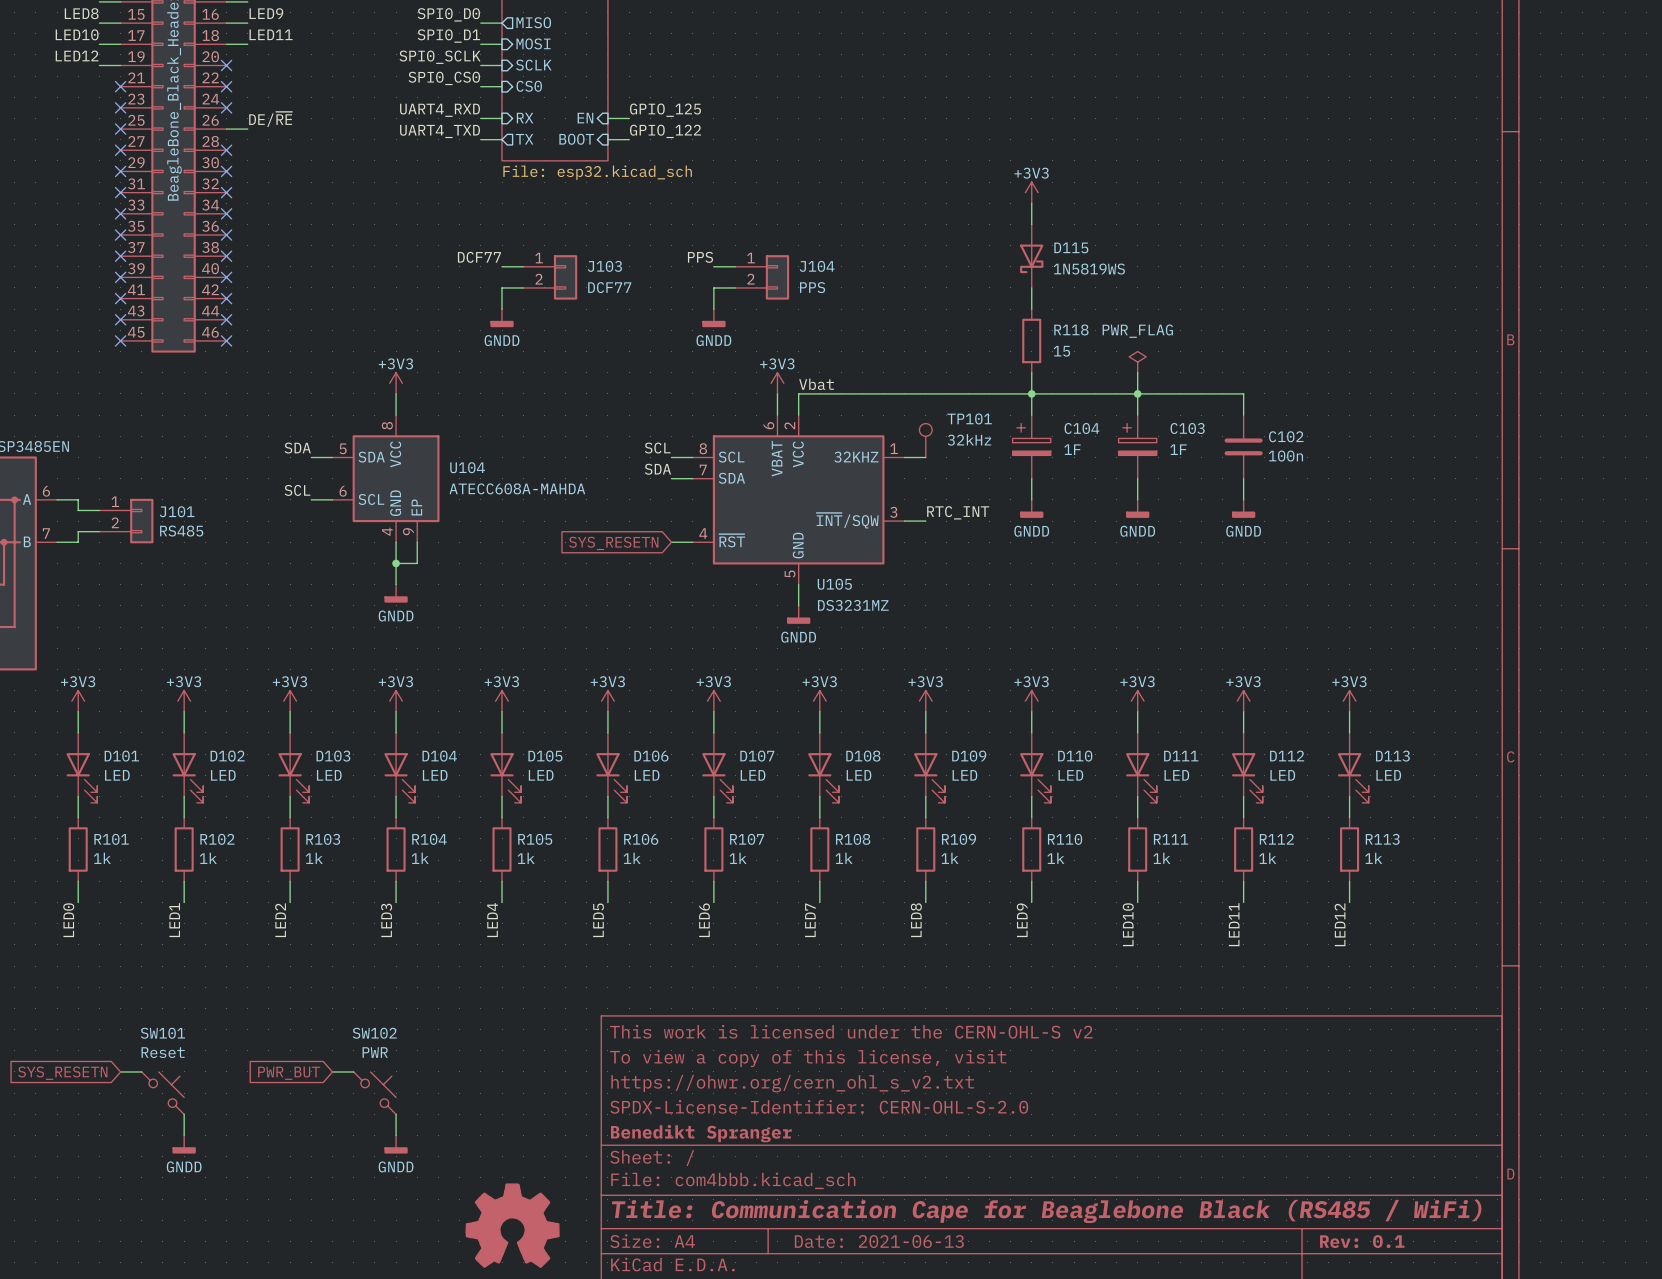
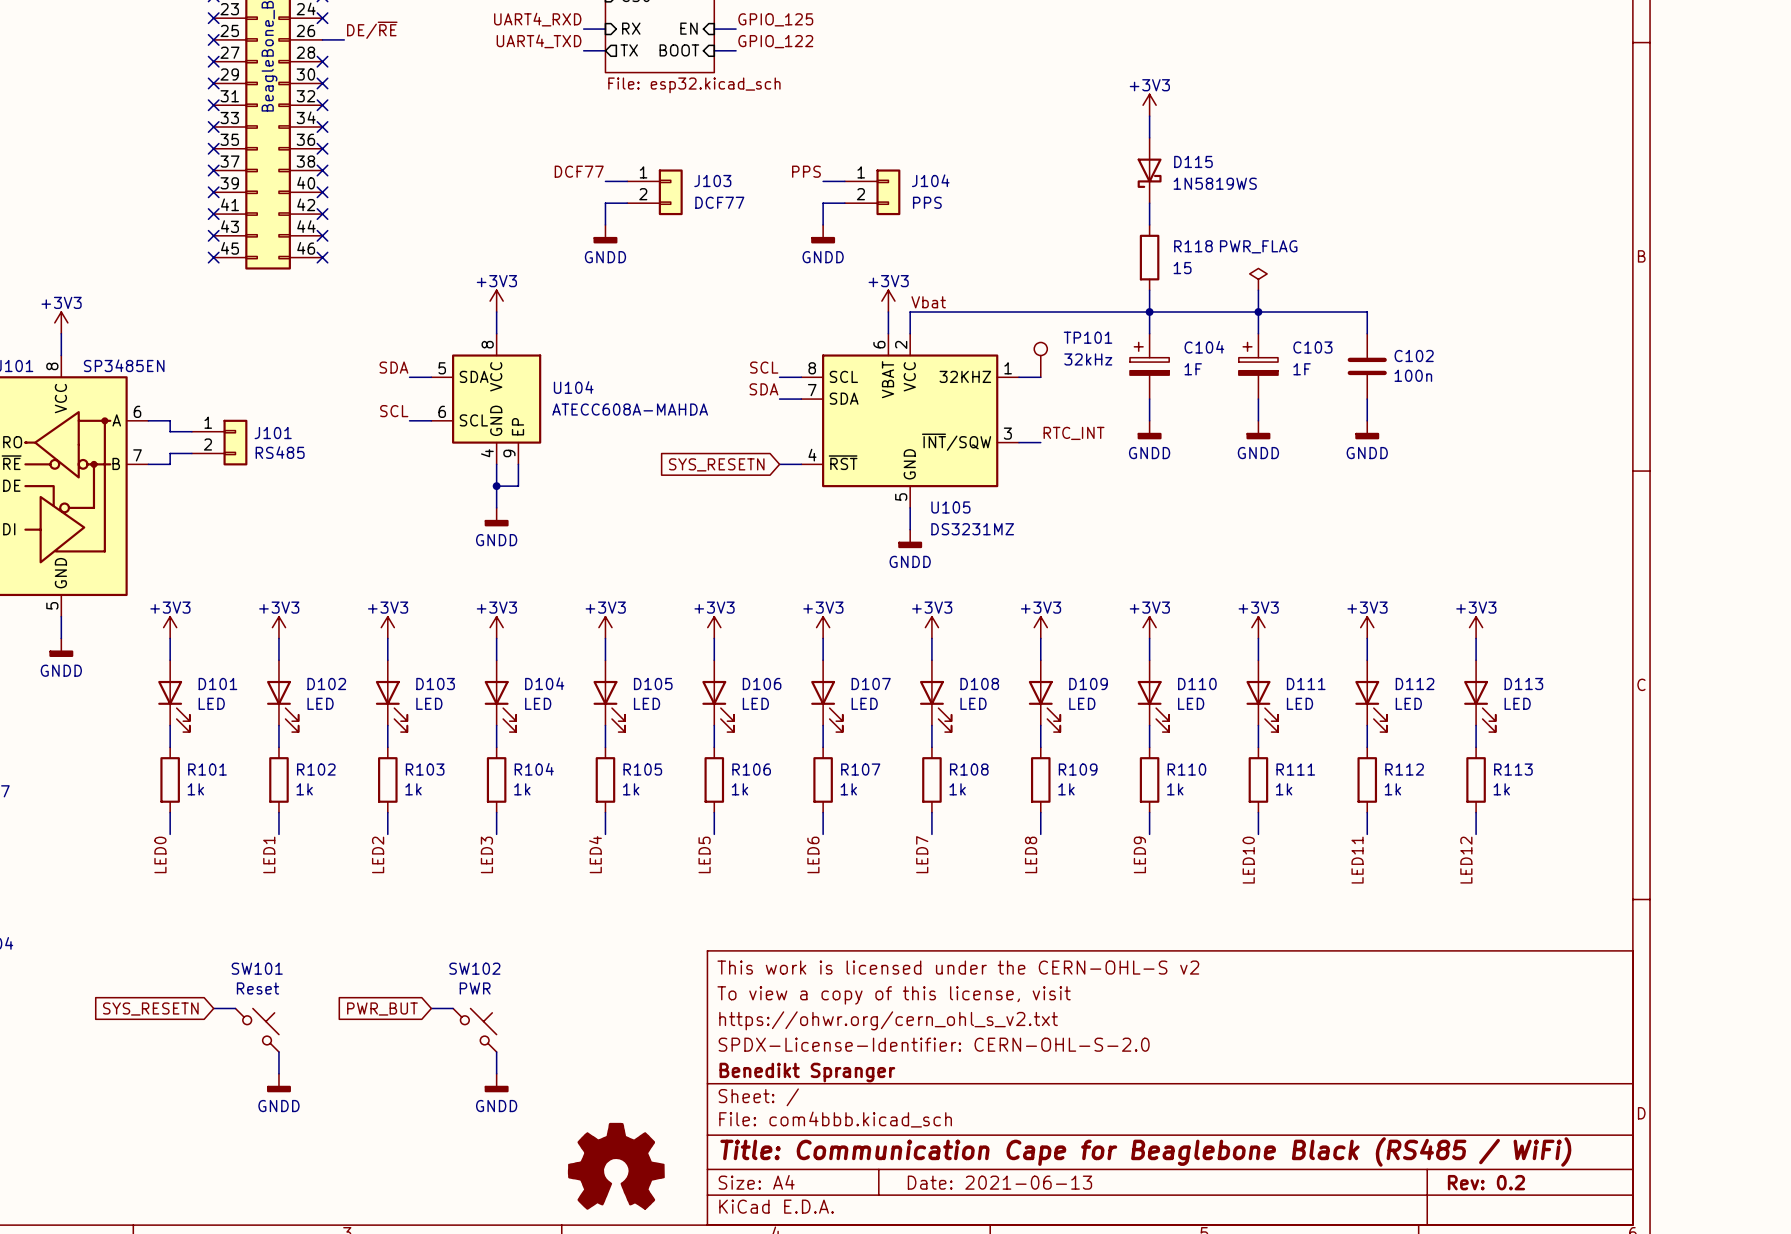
title block: Rev: 0.1 (1362, 1241) -> Rev: 0.2 (1486, 1182)

